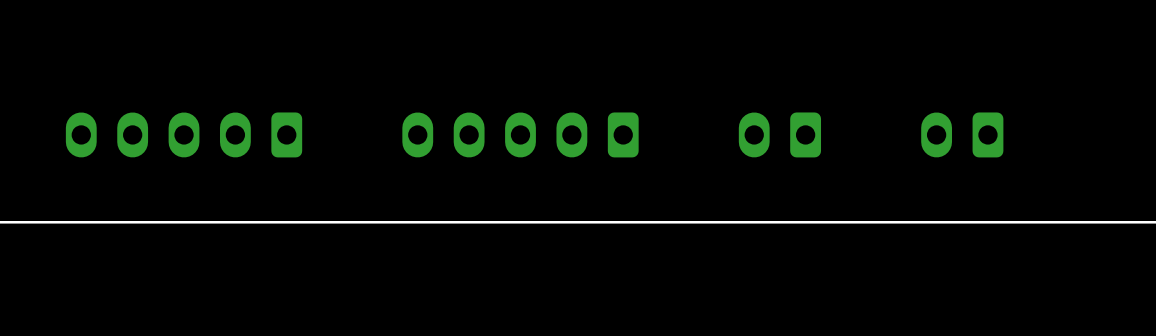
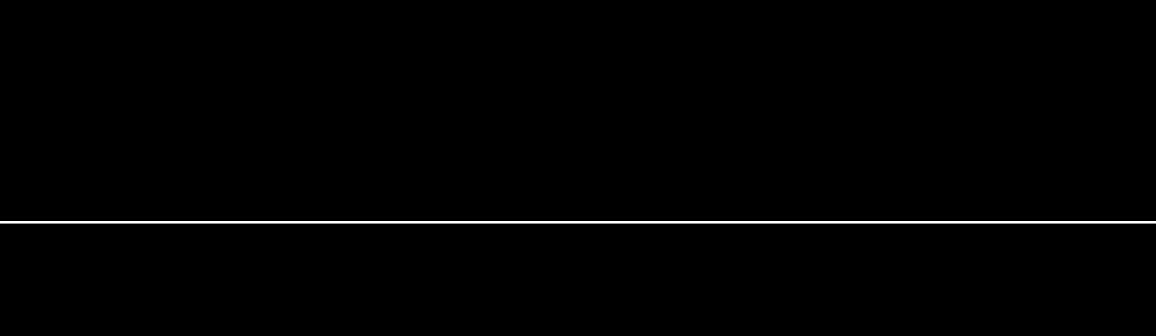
part: (184, 134) -> none
part: (520, 134) -> none
part: (779, 134) -> none
part: (962, 134) -> none

